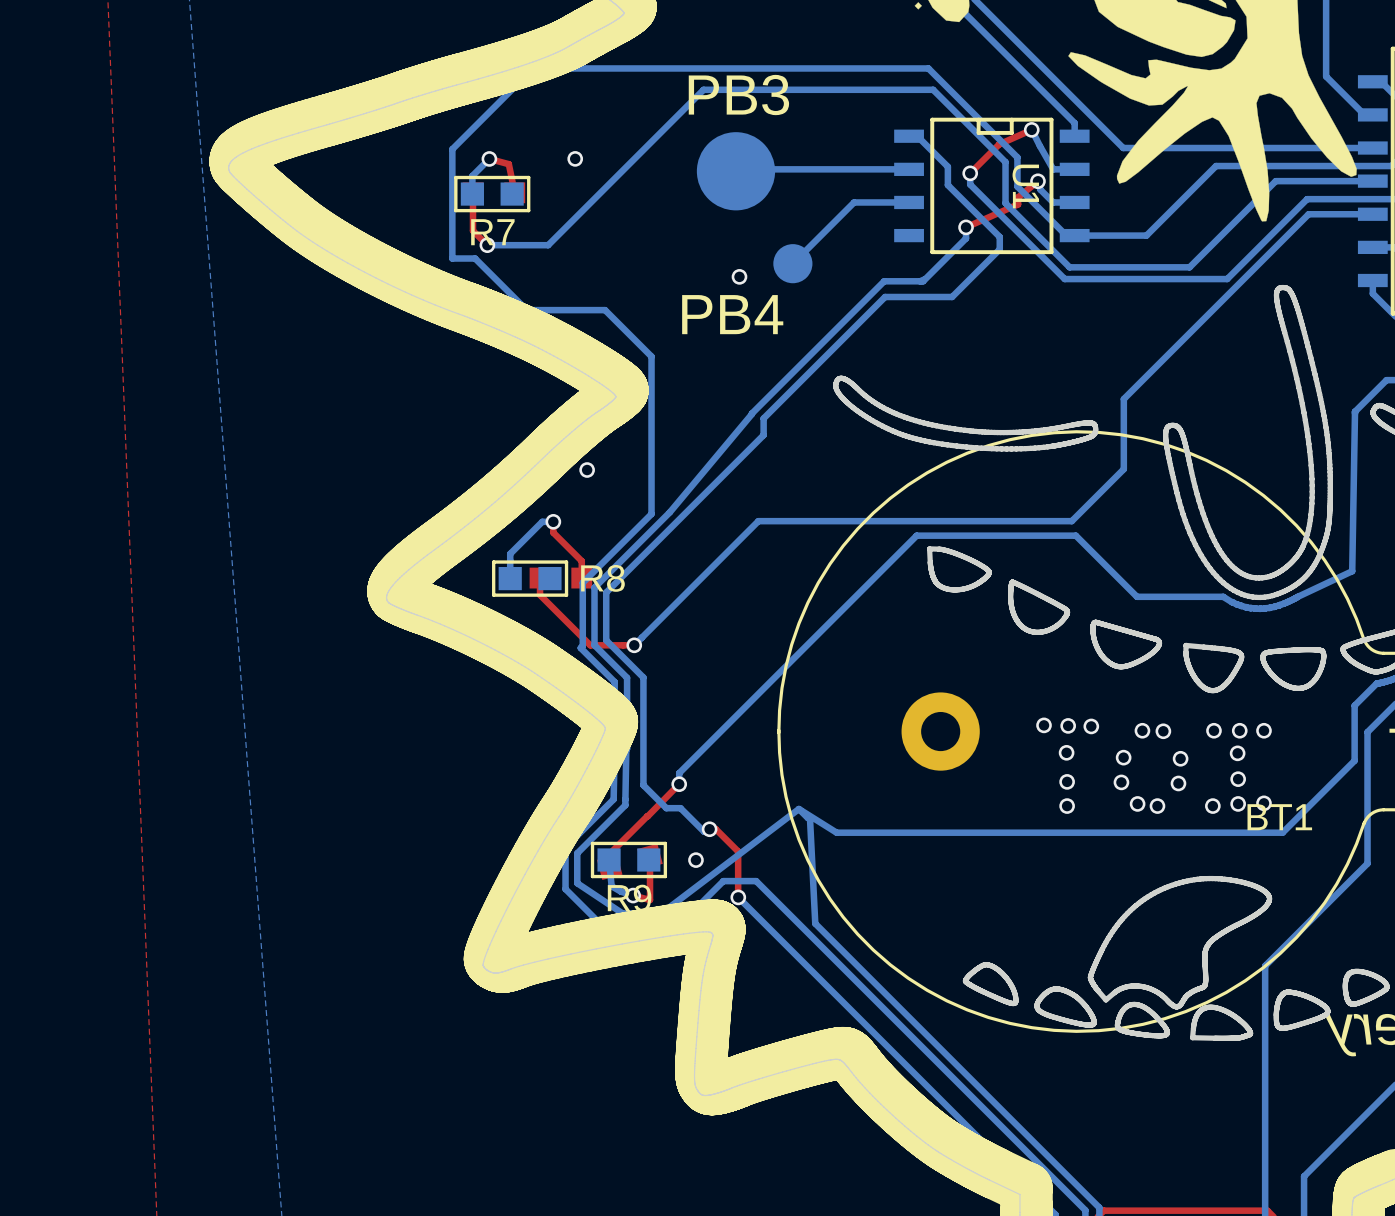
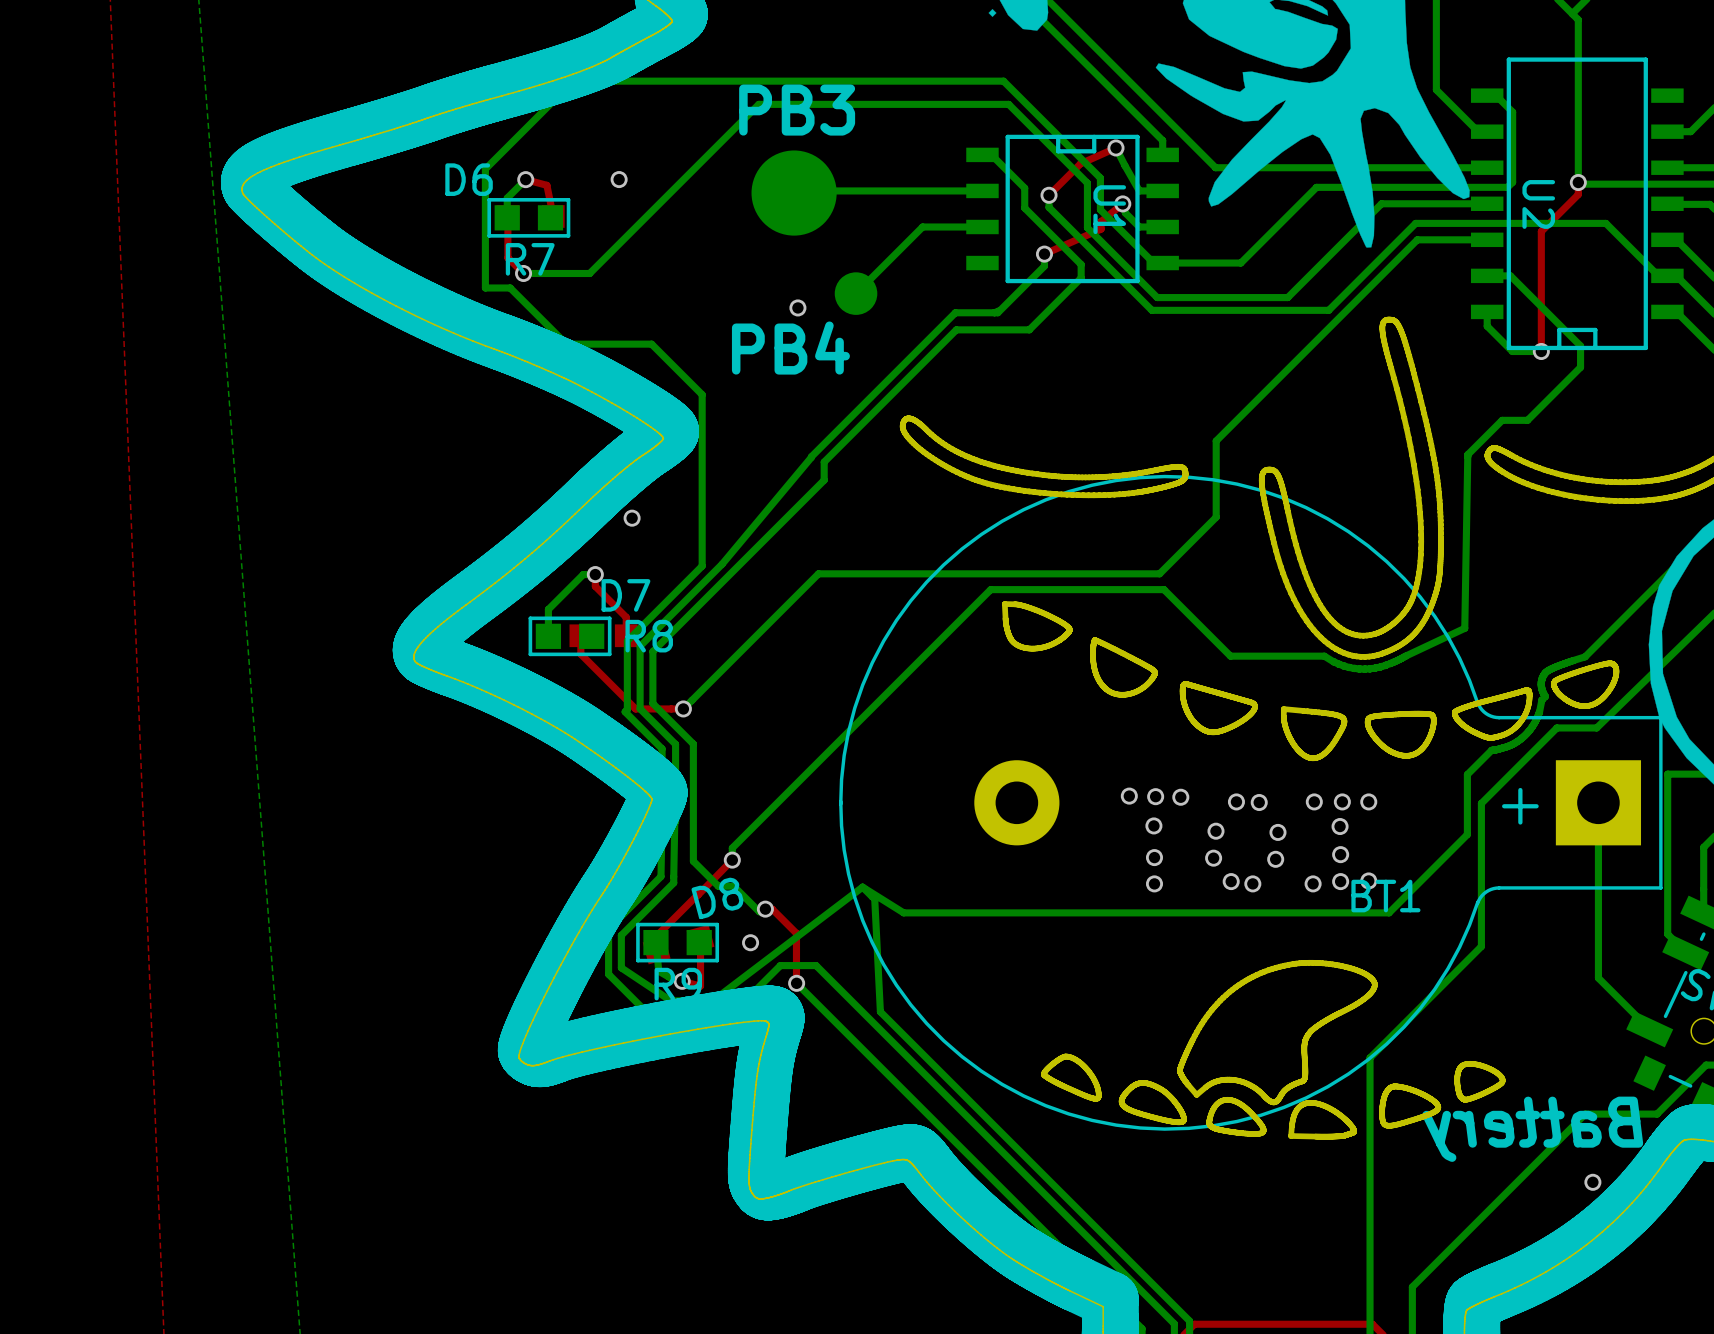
D6 name: none -> D6 (469, 179)
D7 name: none -> D7 (625, 595)
D8 name: none -> D8 (717, 898)

